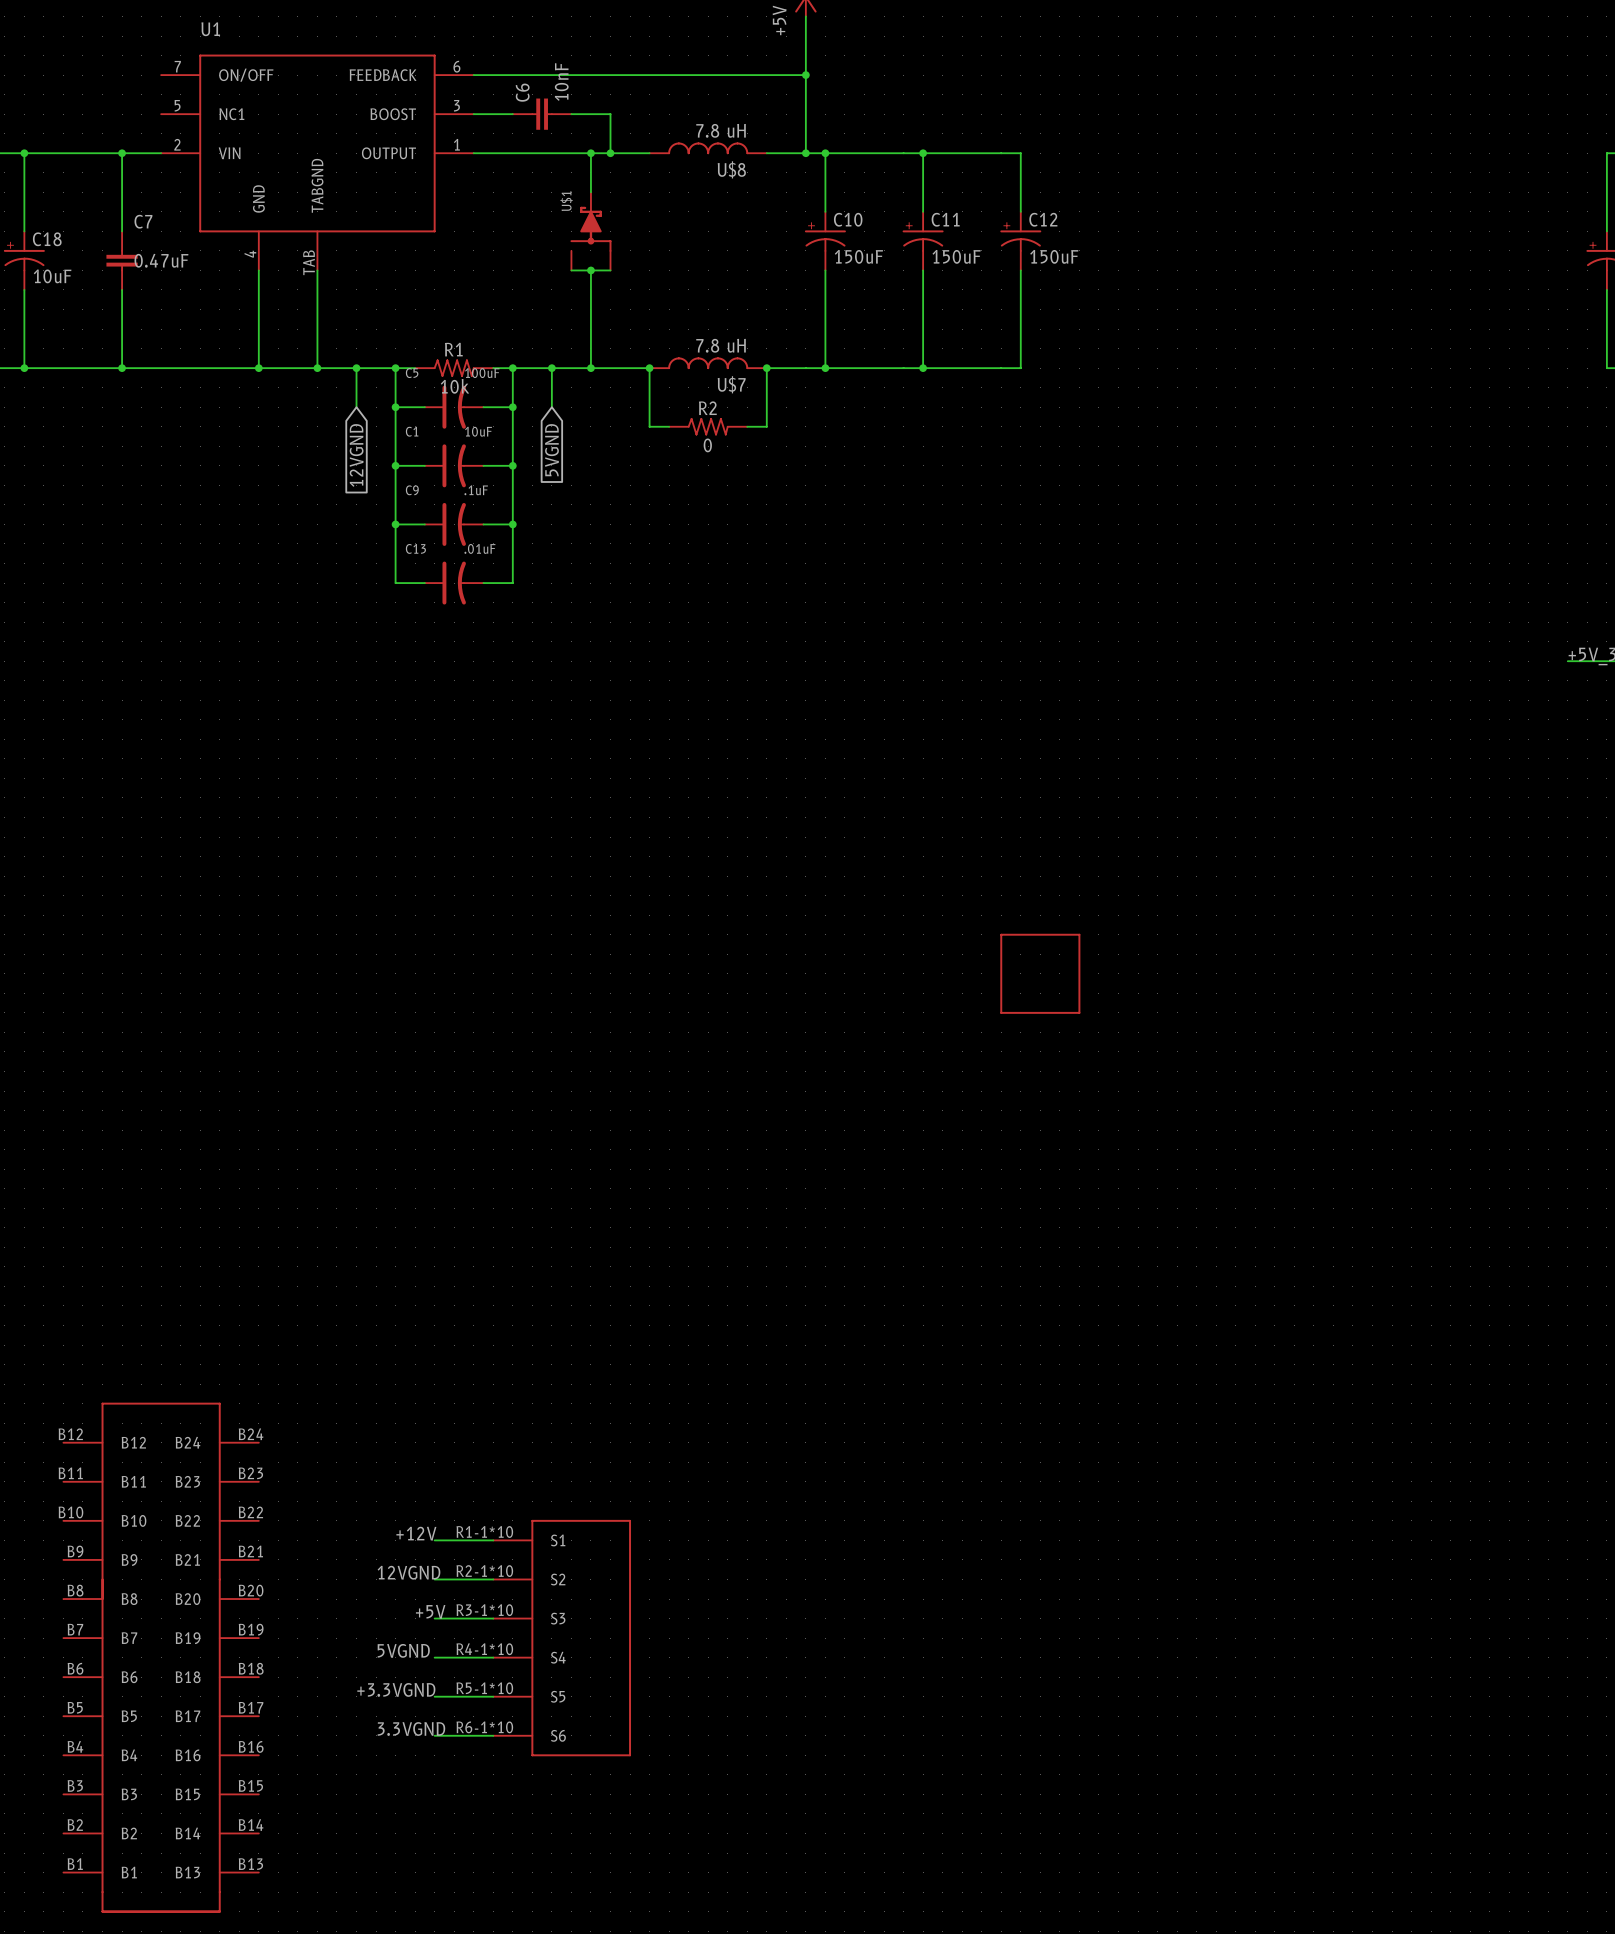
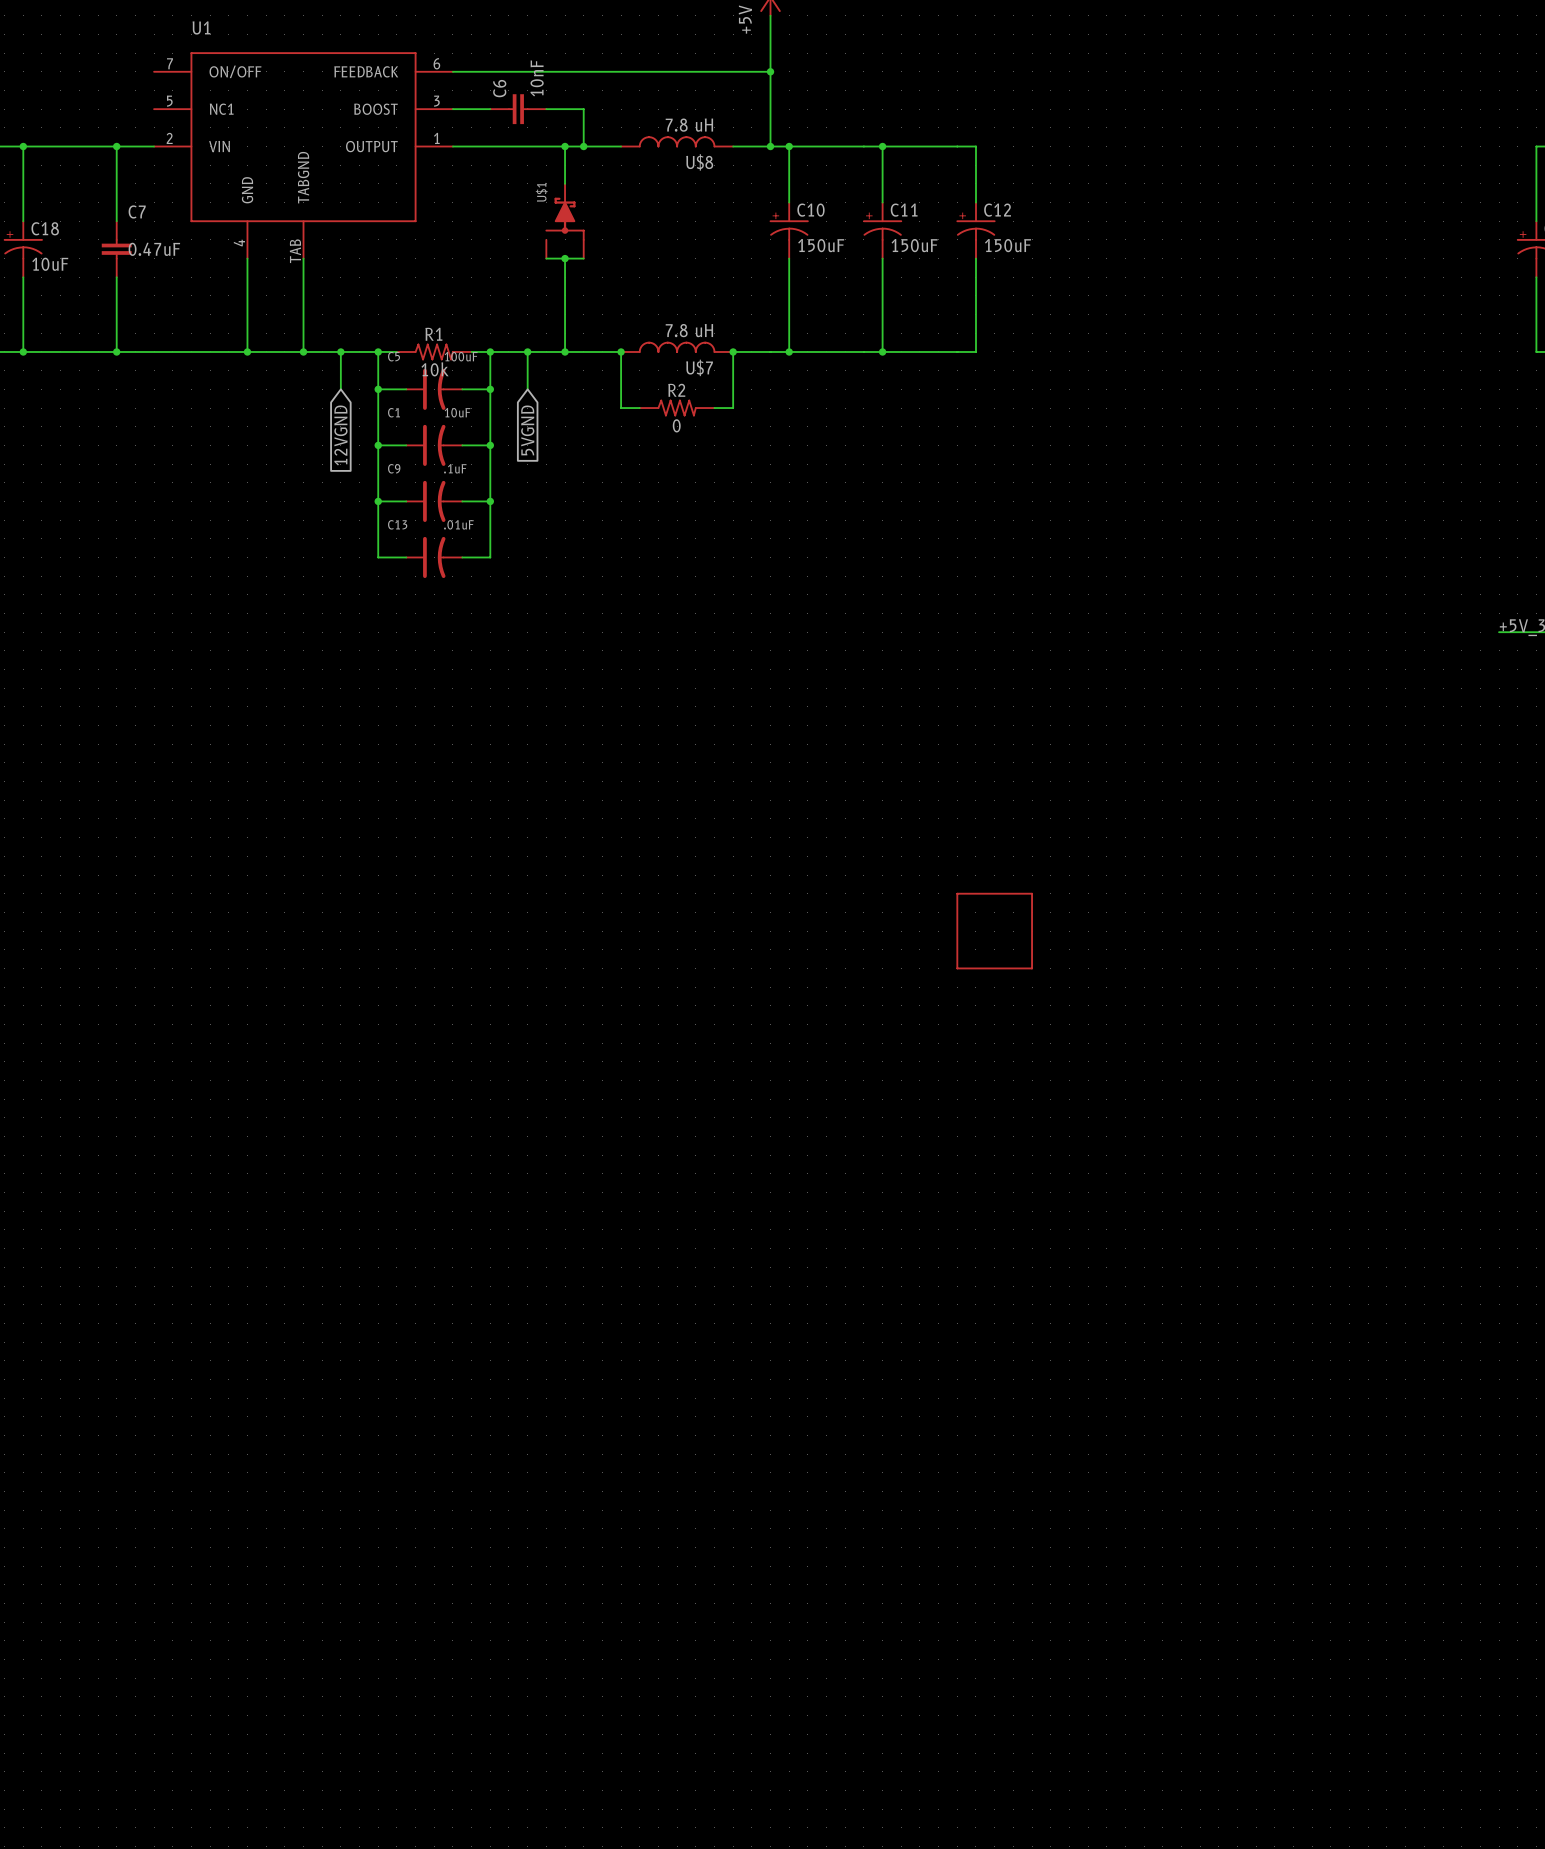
label: +12V (416, 1533) -> none
wire: (434, 1540) (493, 1540) -> none
label: 12VGND (408, 1572) -> none
wire: (434, 1579) (493, 1579) -> none
label: +5V (430, 1611) -> none
wire: (434, 1618) (493, 1618) -> none
part: (562, 1638) -> none
label: 5VGND (403, 1650) -> none
part: (161, 1657) -> none
wire: (434, 1657) (493, 1657) -> none
label: +3.3VGND (396, 1689) -> none
wire: (434, 1696) (493, 1696) -> none
label: 3.3VGND (411, 1729) -> none
wire: (434, 1735) (493, 1735) -> none

